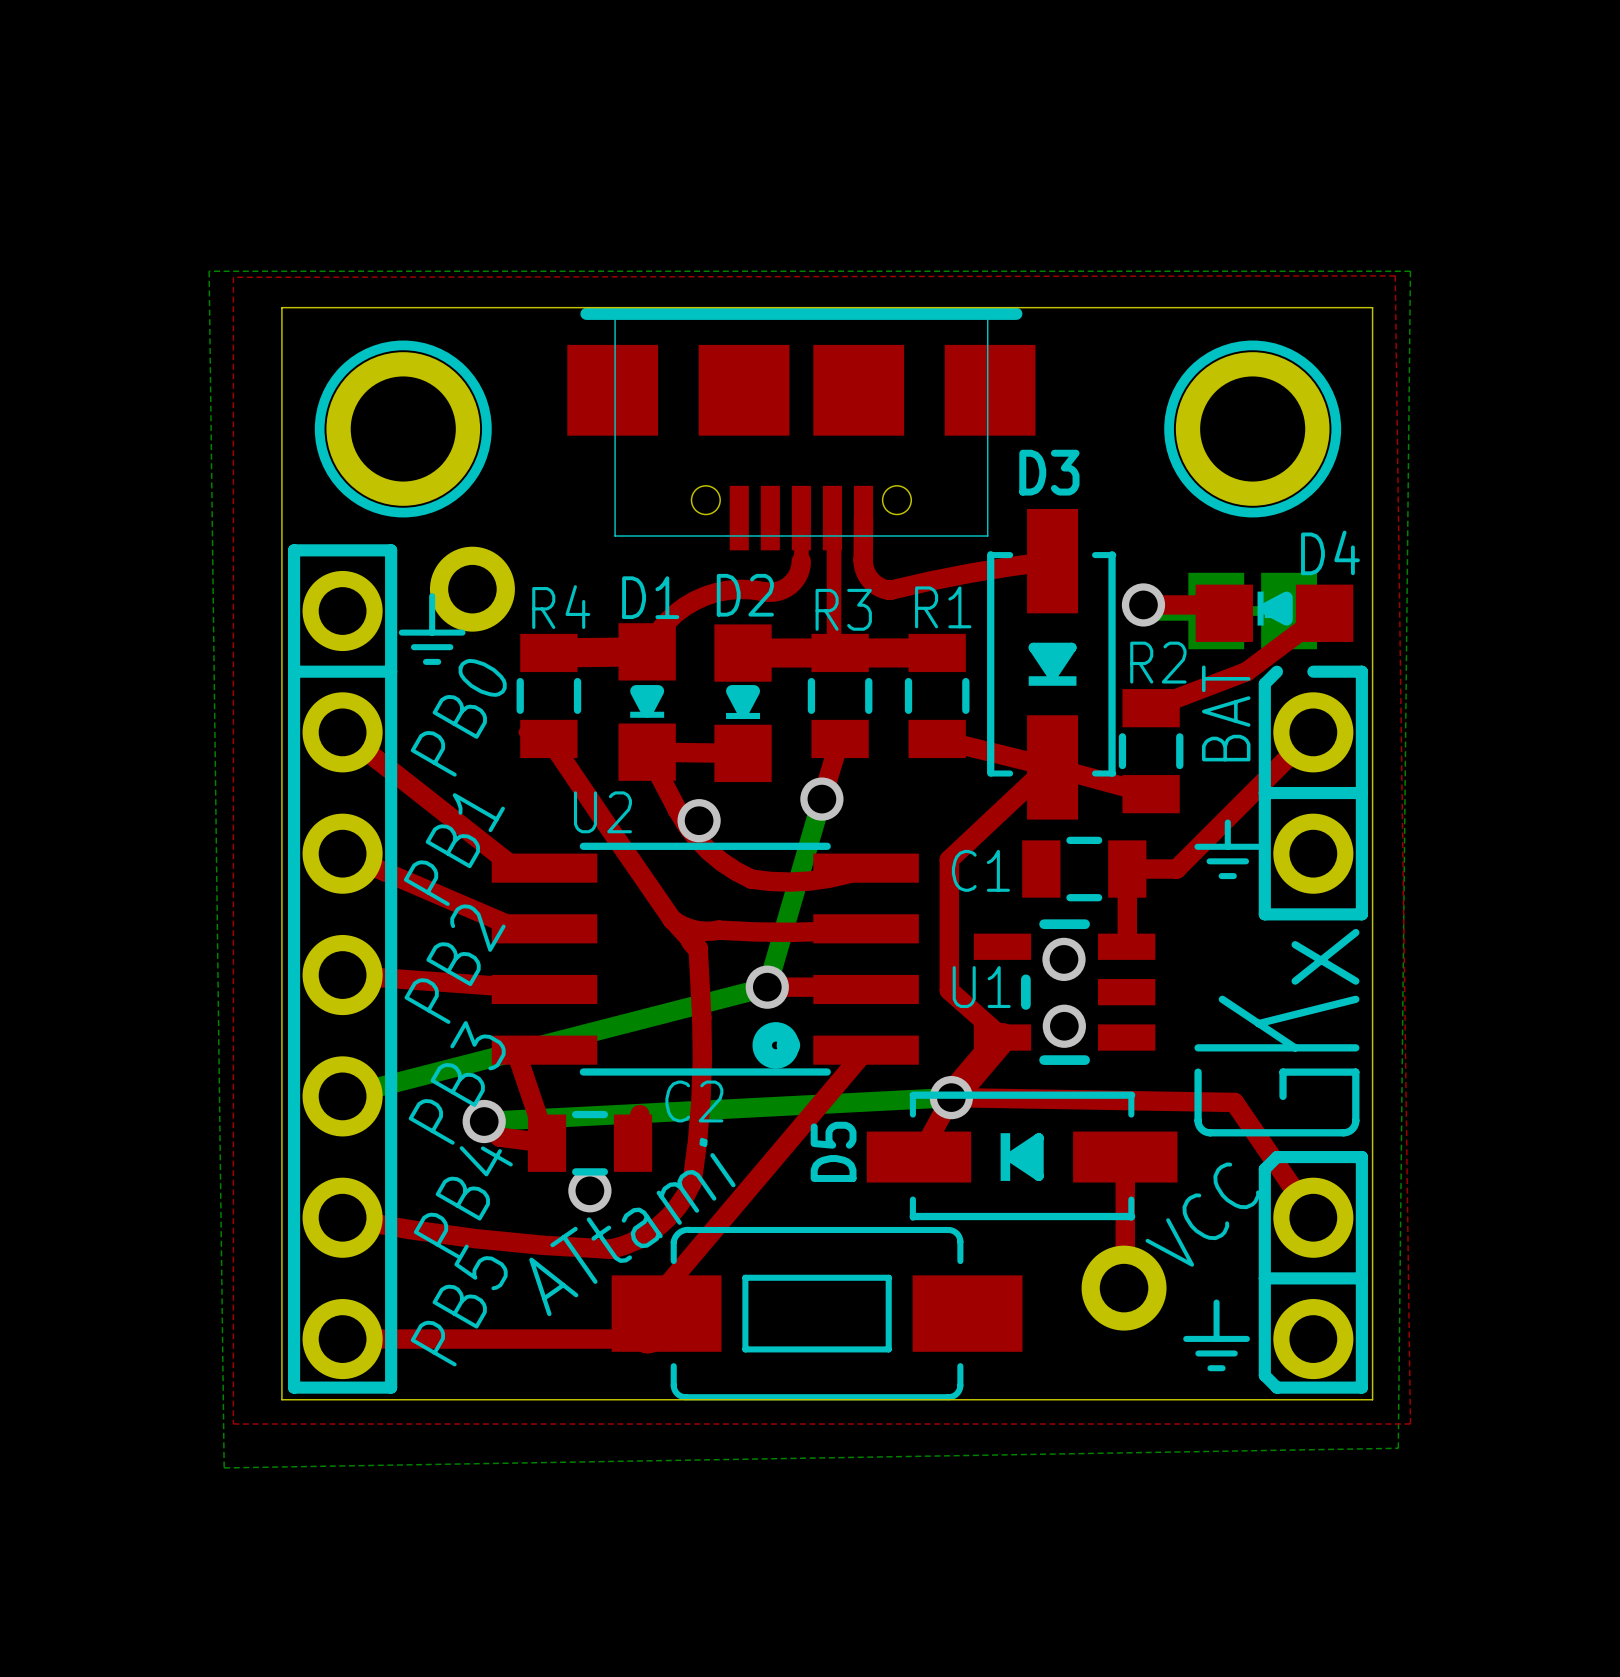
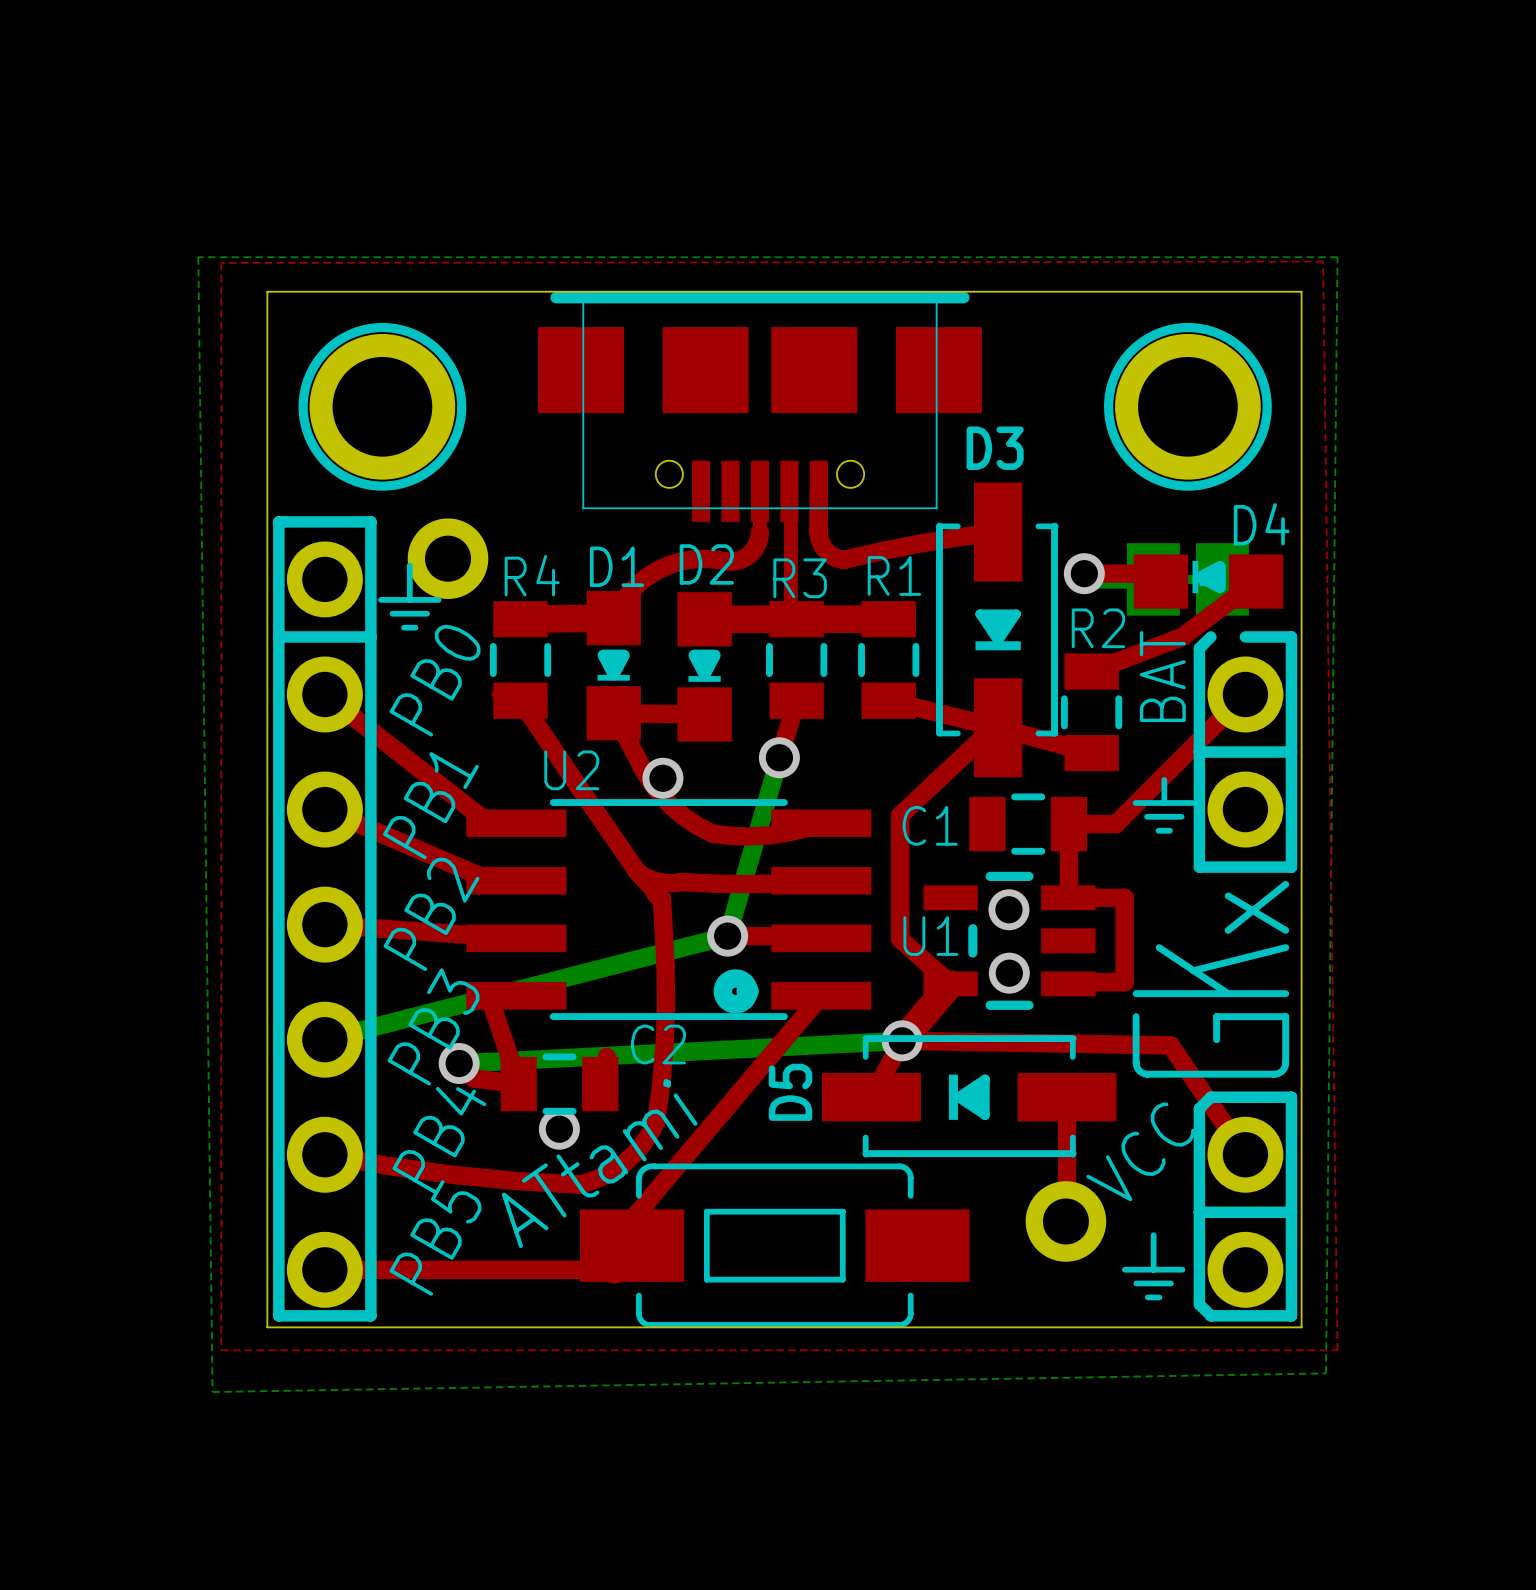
top track: none -> (1068, 897) (1124, 897) (1124, 982) (1068, 982) (1068, 983)

